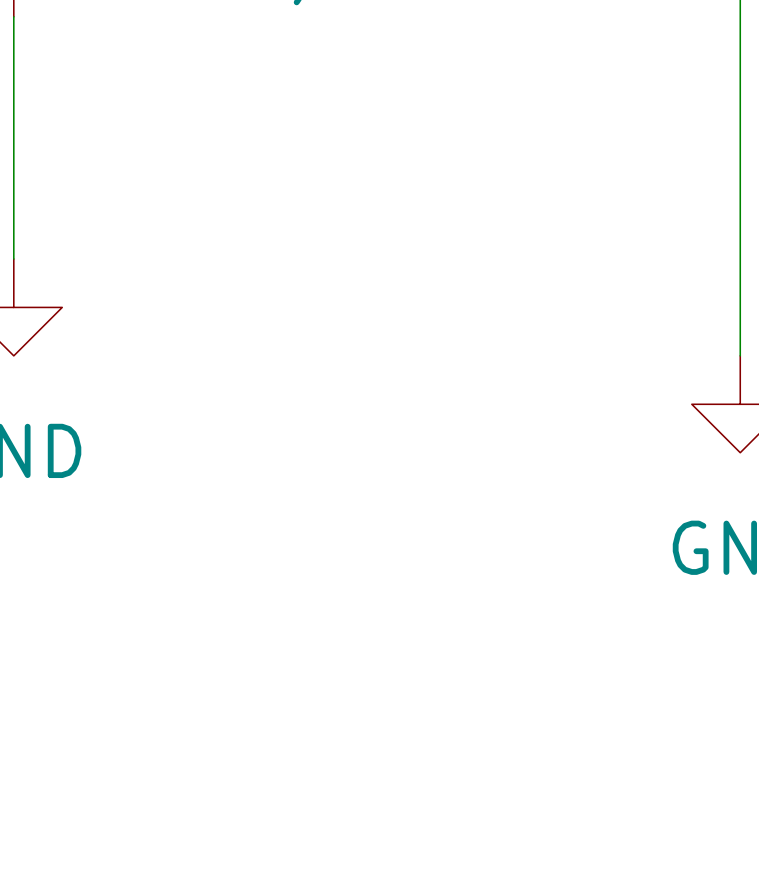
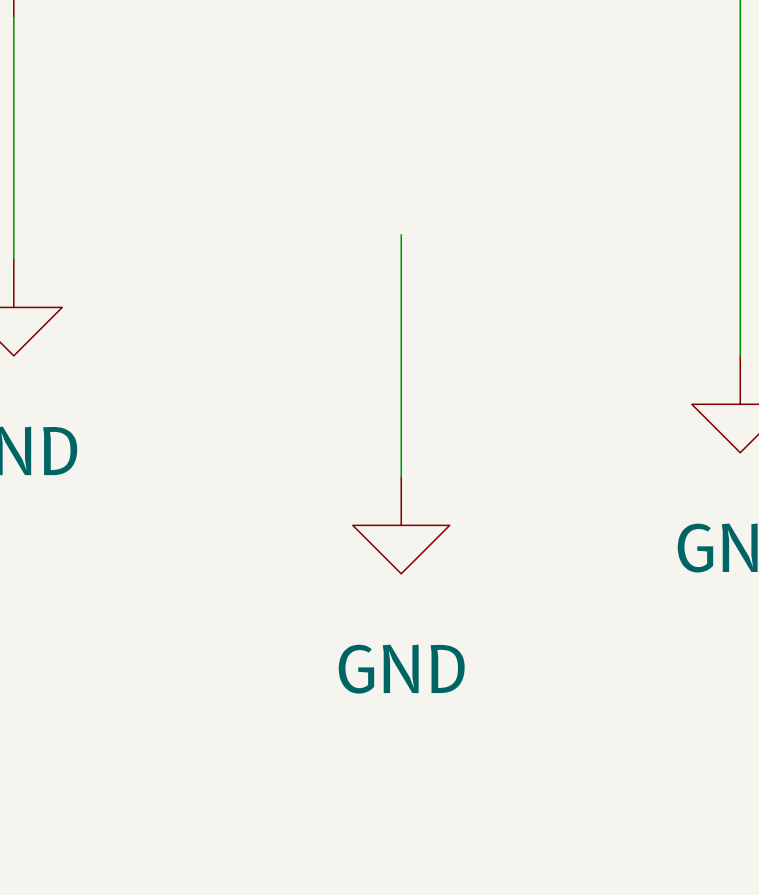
wire: none -> (401, 234) (401, 476)
power symbol: none -> GND (401, 525)

